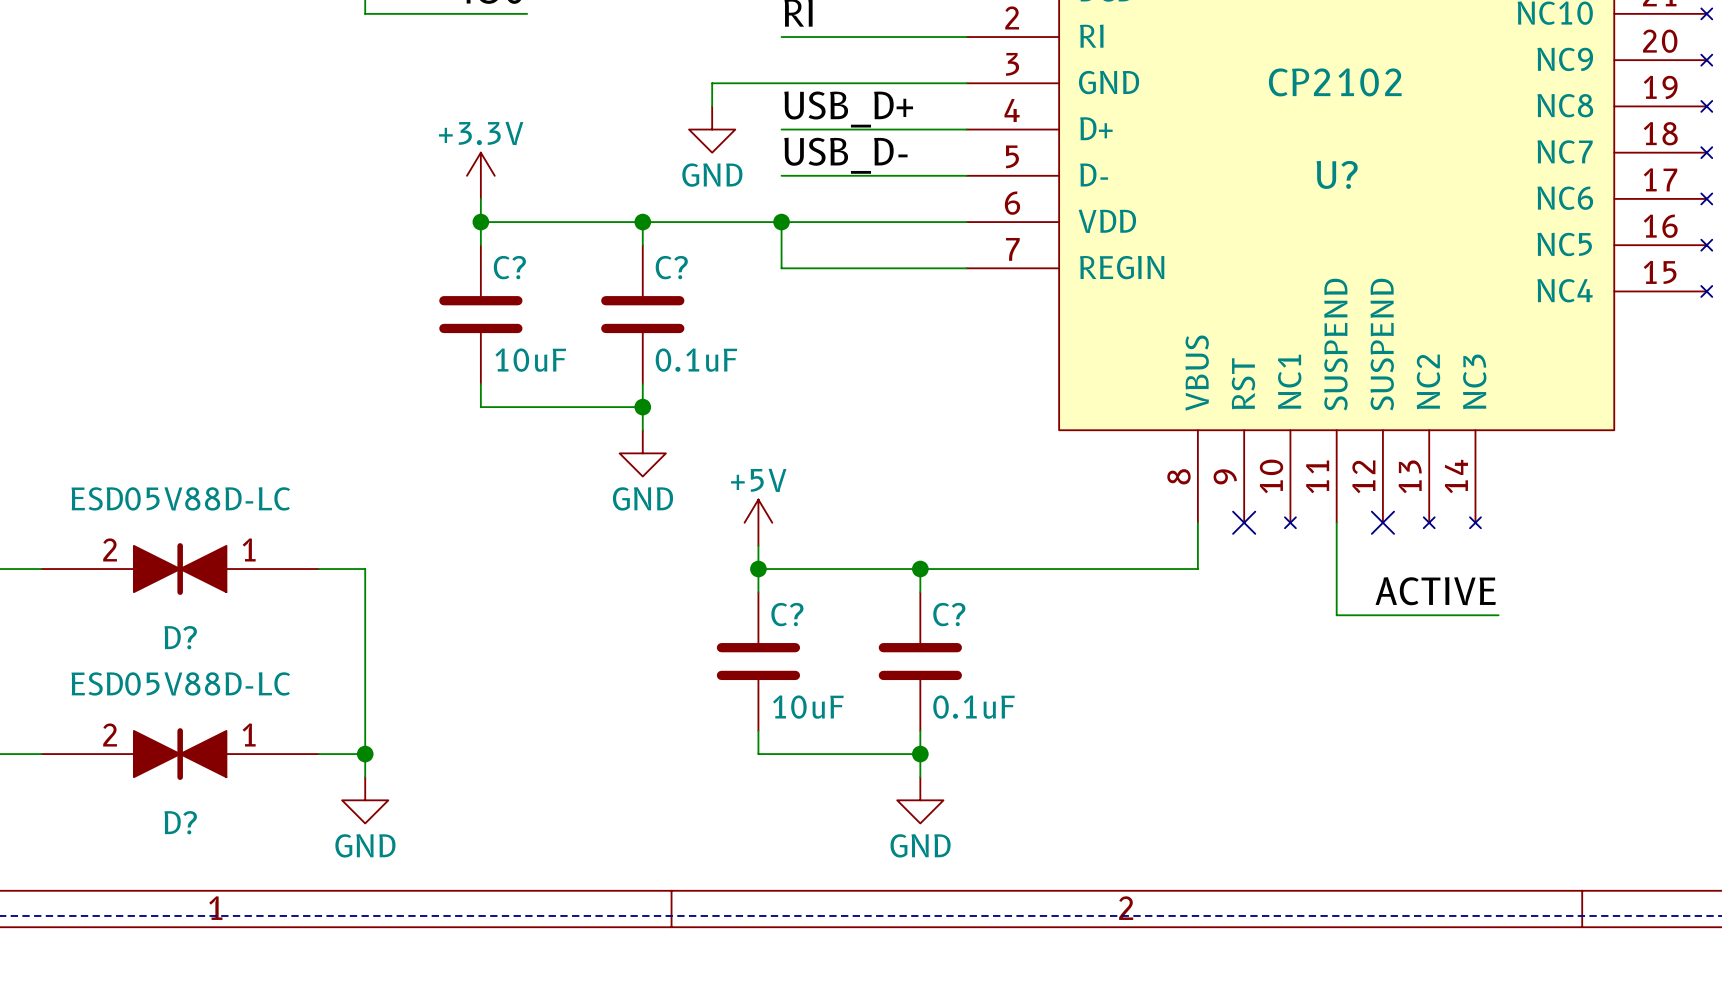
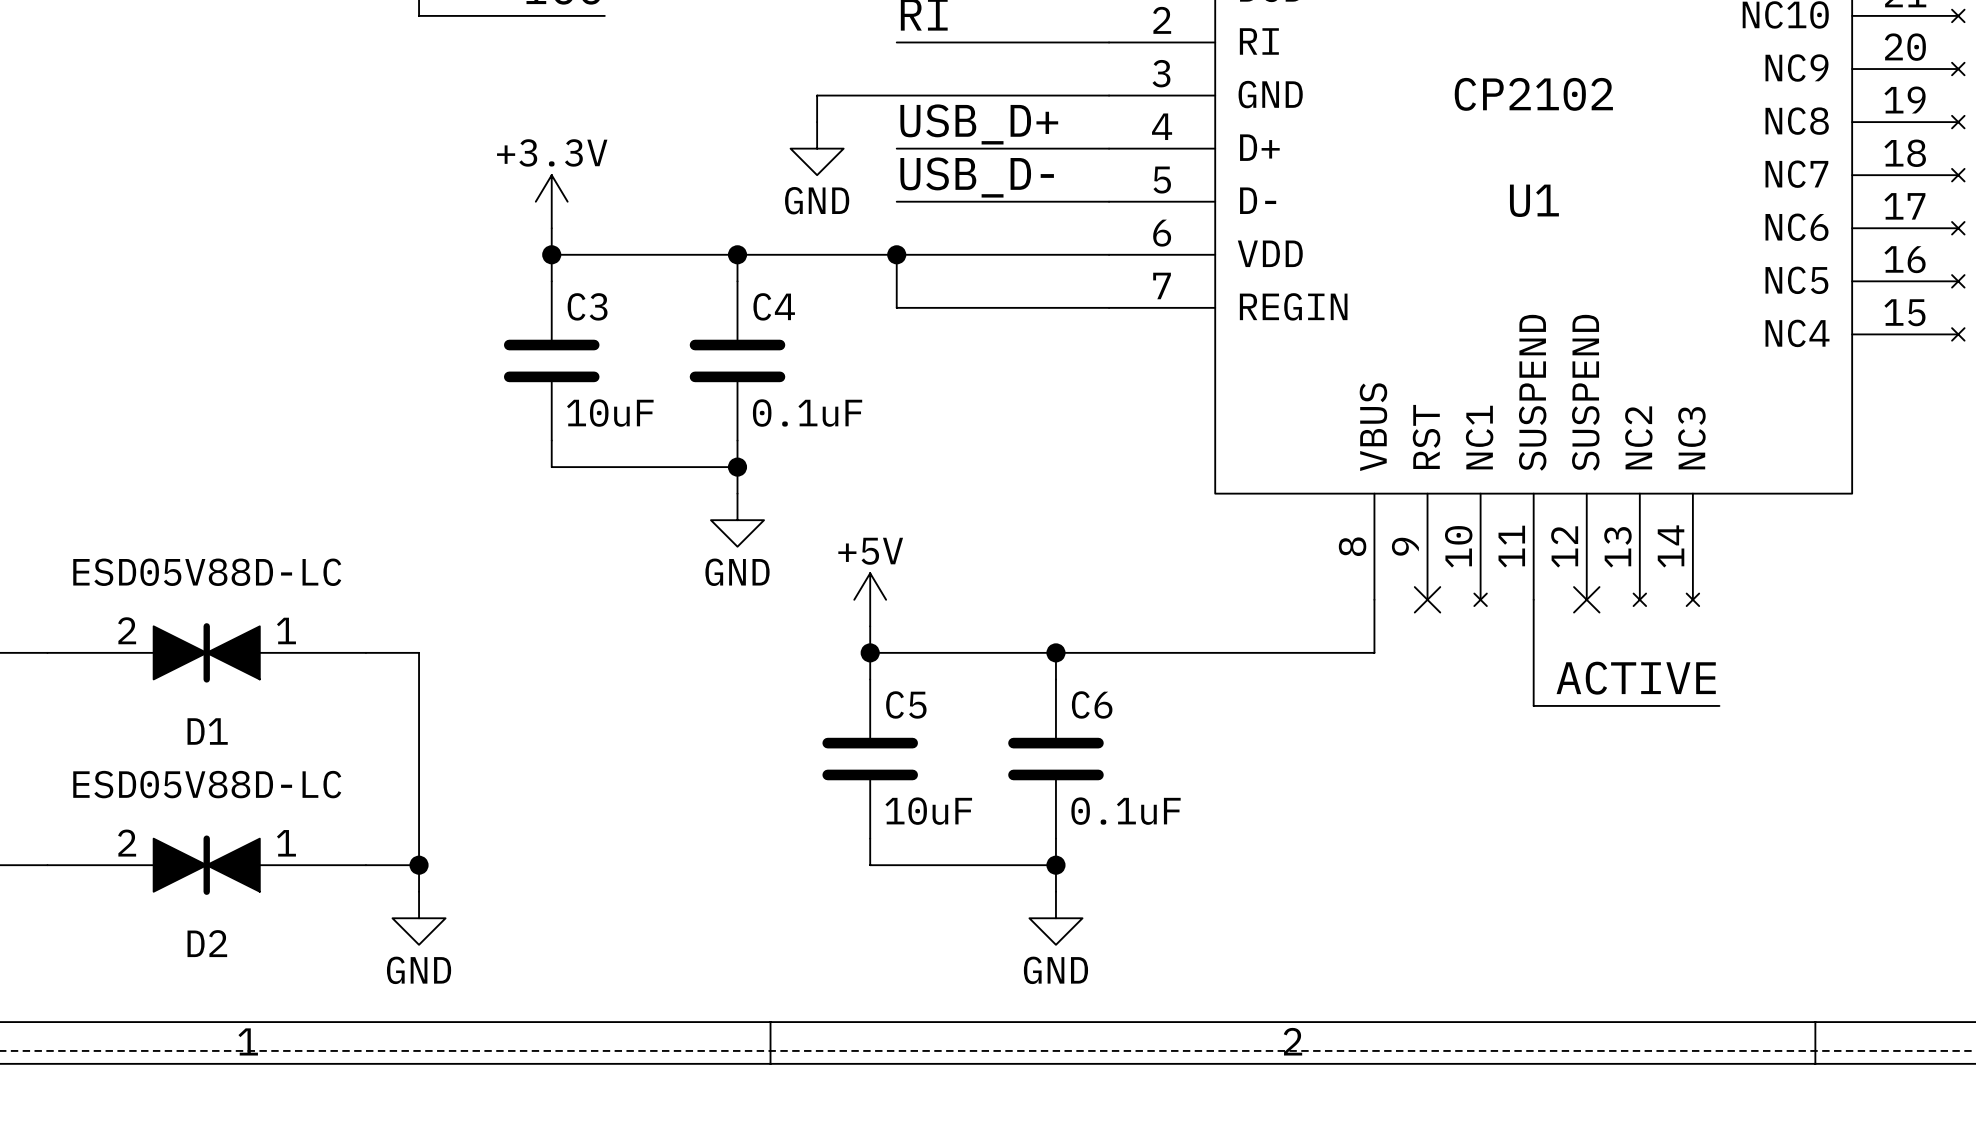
U? name: U? (1337, 174) -> U1 (1534, 200)
C? name: C? (509, 267) -> C3 (587, 306)
C? name: C? (671, 267) -> C4 (774, 306)
C? name: C? (787, 614) -> C5 (906, 704)
C? name: C? (949, 614) -> C6 (1092, 704)
D? name: D? (180, 637) -> D1 (207, 731)
D? name: D? (180, 822) -> D2 (207, 943)

